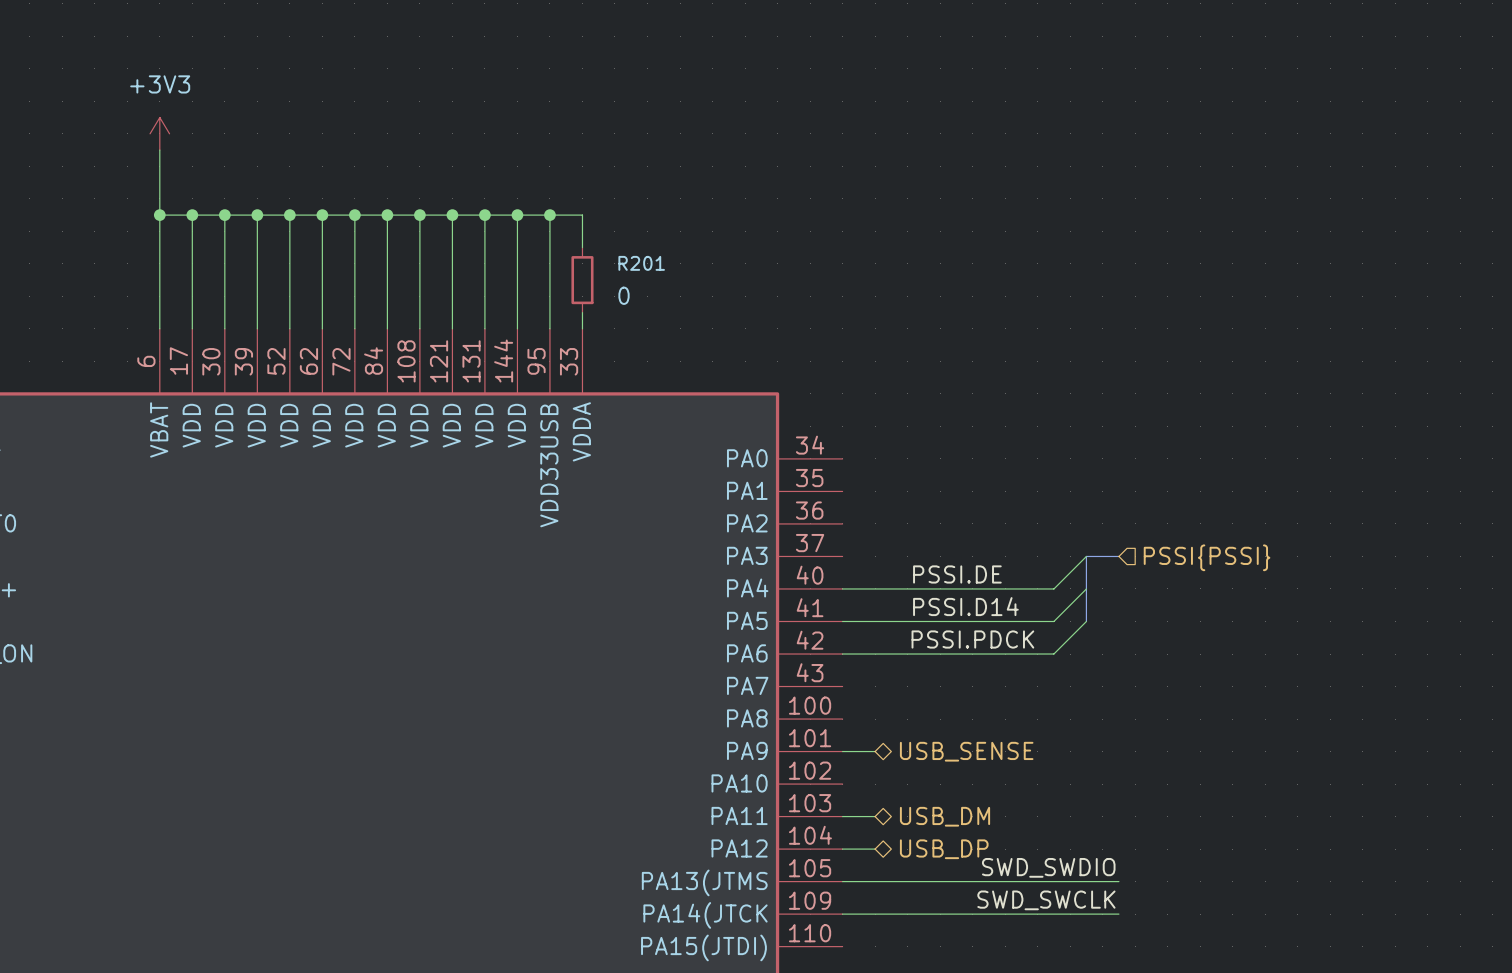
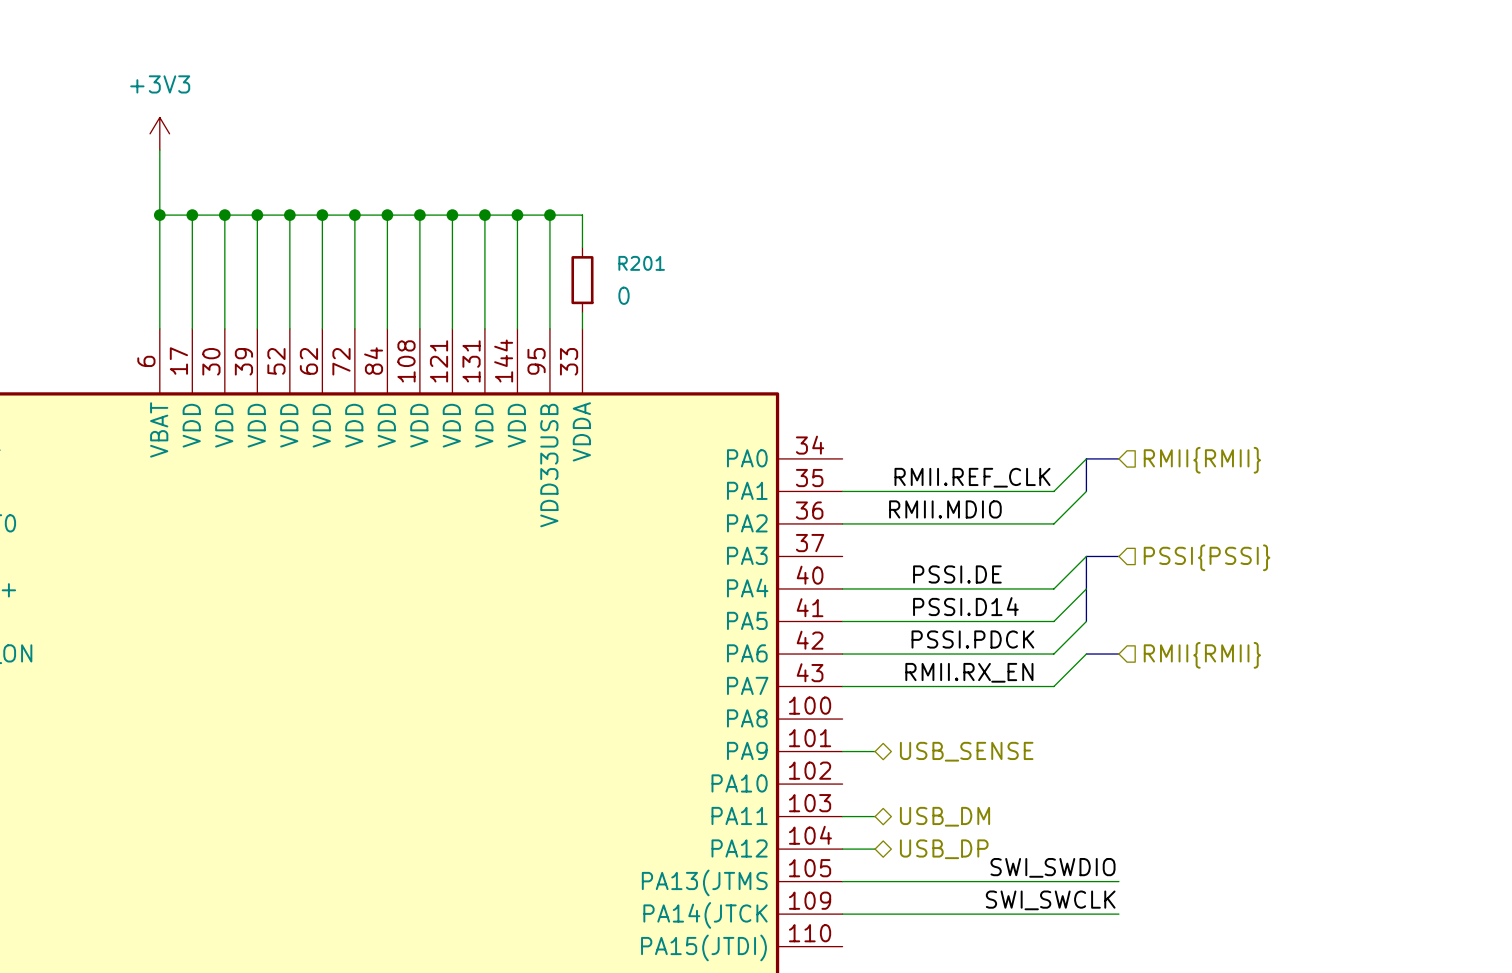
wire: none -> (1086, 458) (1053, 491) (842, 491)
bus: none -> (1118, 458) (1086, 458) (1086, 491)
hierarchical label: none -> RMII{RMII} (1202, 460)
label: none -> RMII.REF_CLK (972, 477)
wire: none -> (1086, 491) (1053, 523) (842, 523)
label: none -> RMII.MDIO (945, 509)
wire: none -> (1086, 654) (1053, 686) (842, 686)
bus: none -> (1086, 654) (1118, 654)
hierarchical label: none -> RMII{RMII} (1202, 655)
label: none -> RMII.RX_EN (969, 672)
label: SWD_SWDIO (1048, 867) -> SWI_SWDIO (1053, 867)
label: SWD_SWCLK (1046, 900) -> SWI_SWCLK (1050, 900)

